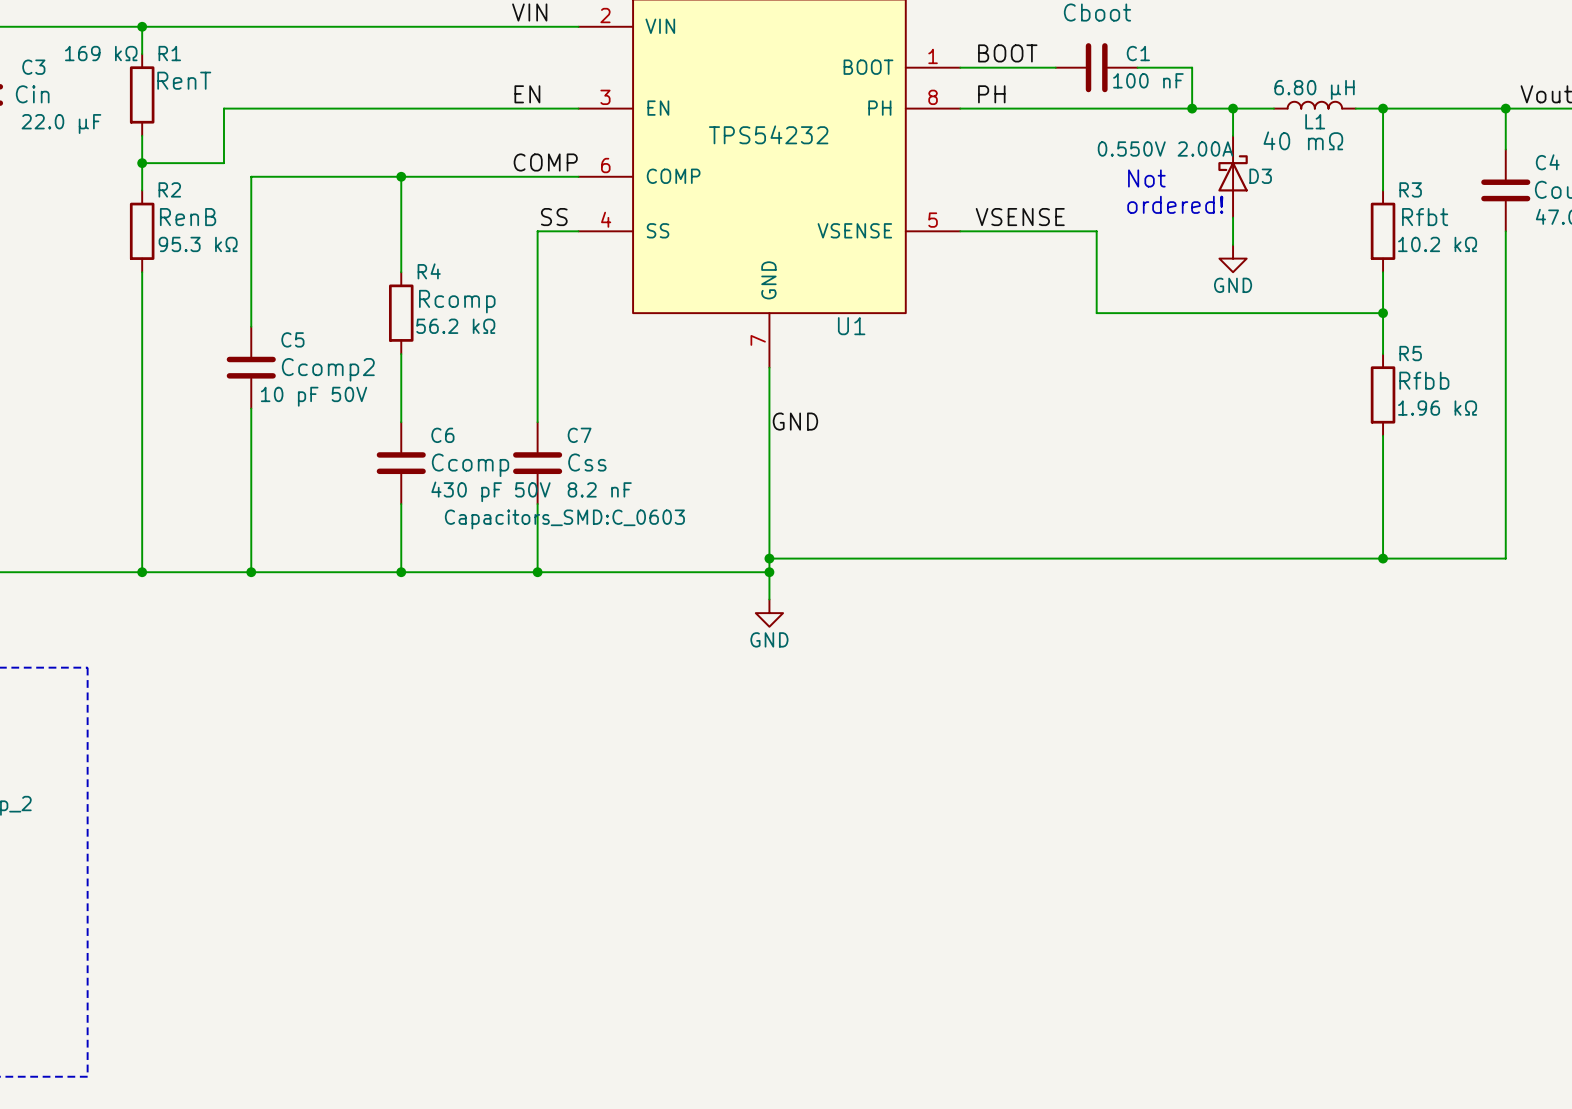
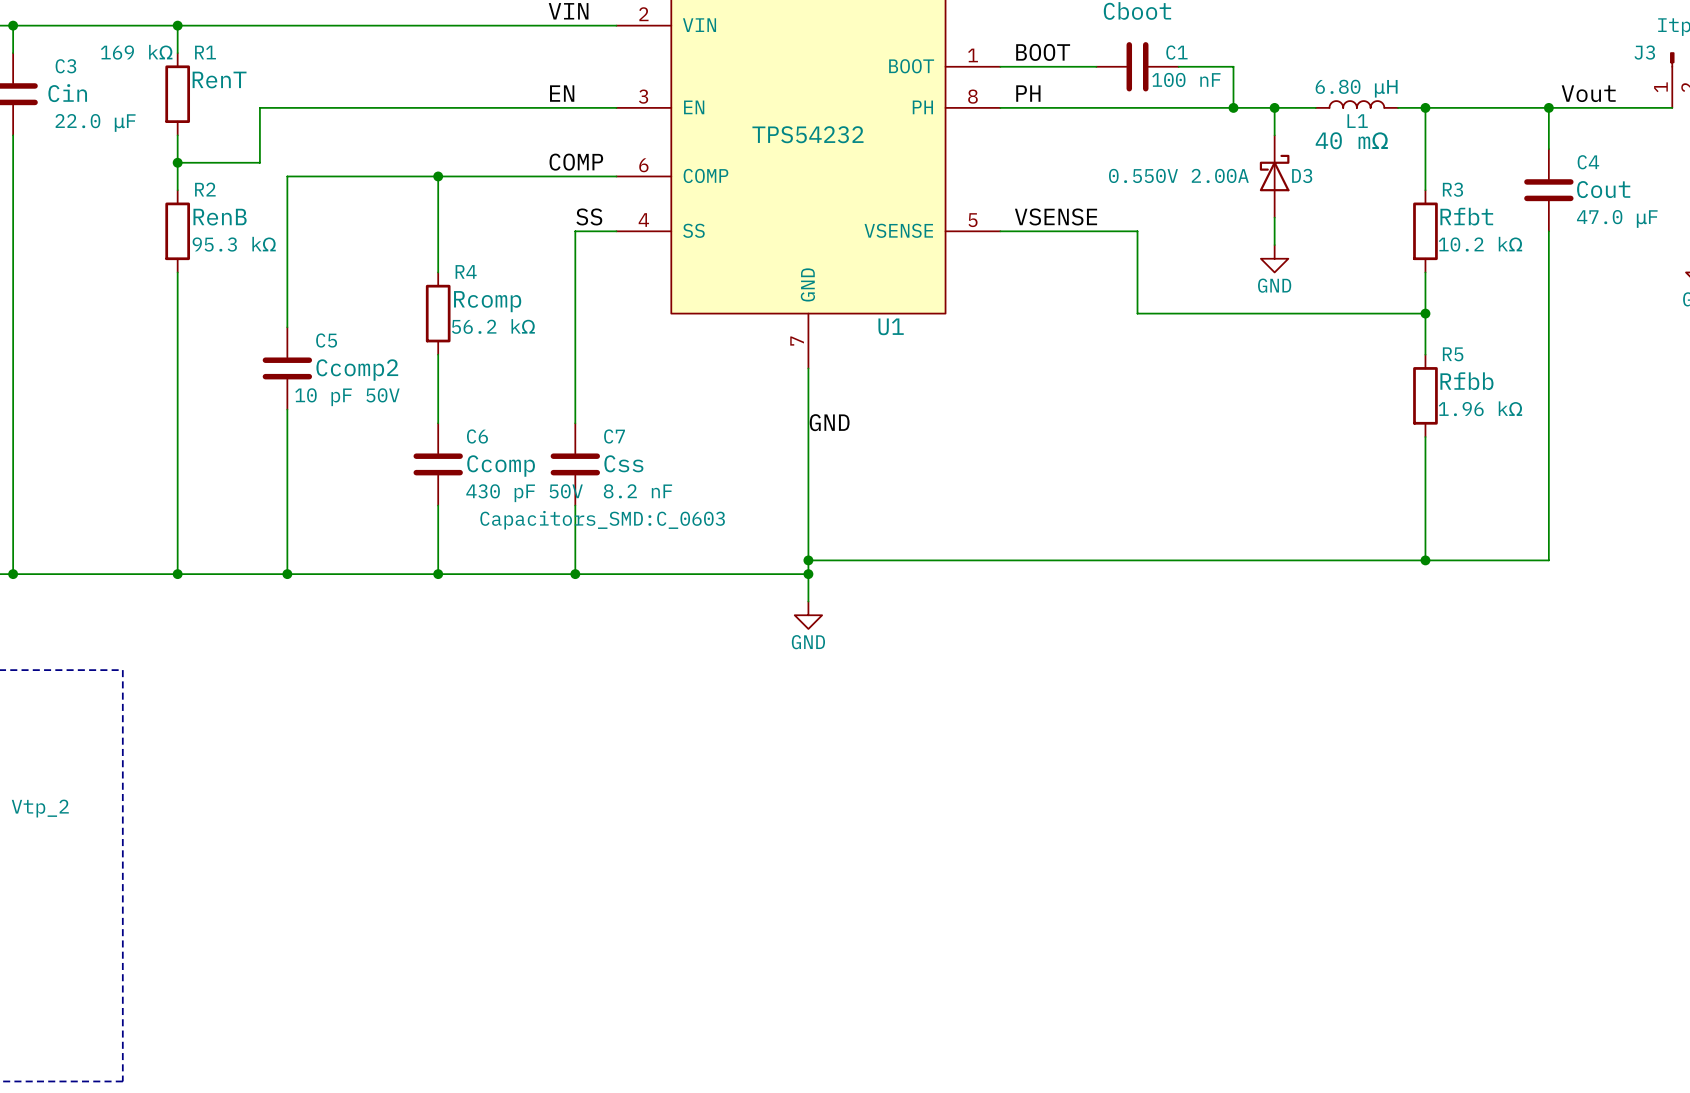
D3 value position: 0.550V 2.00A (1165, 148) -> 0.550V 2.00A (1178, 175)
text: Not (1146, 178) -> none
text: ordered! (1175, 204) -> none

